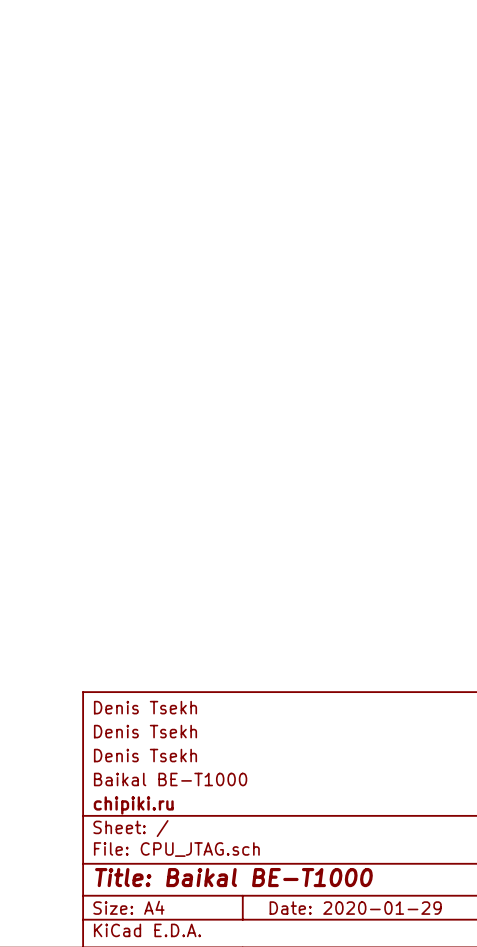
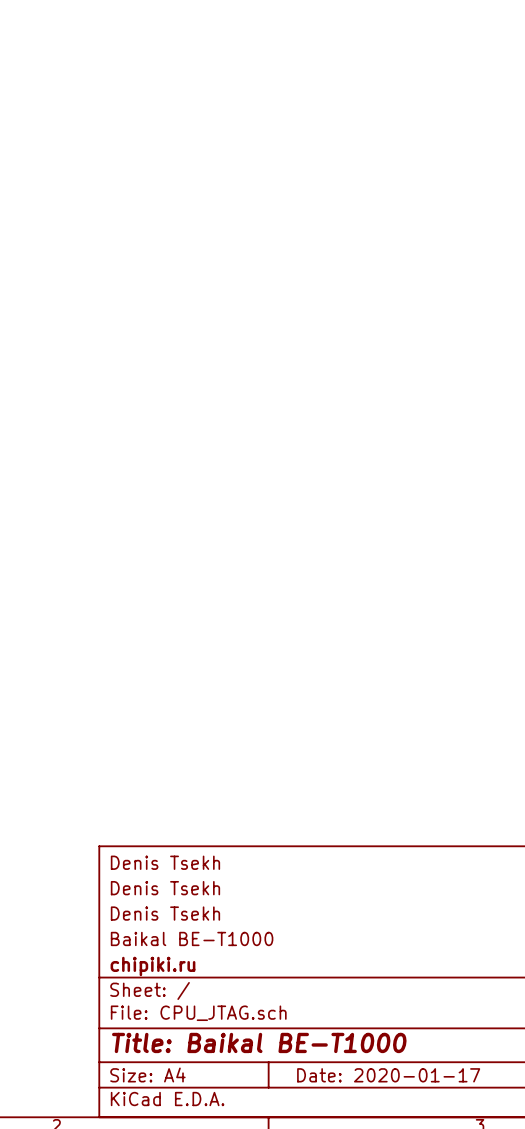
title block: Date: 2020-01-29 (355, 908) -> Date: 2020-01-17 (388, 1075)

